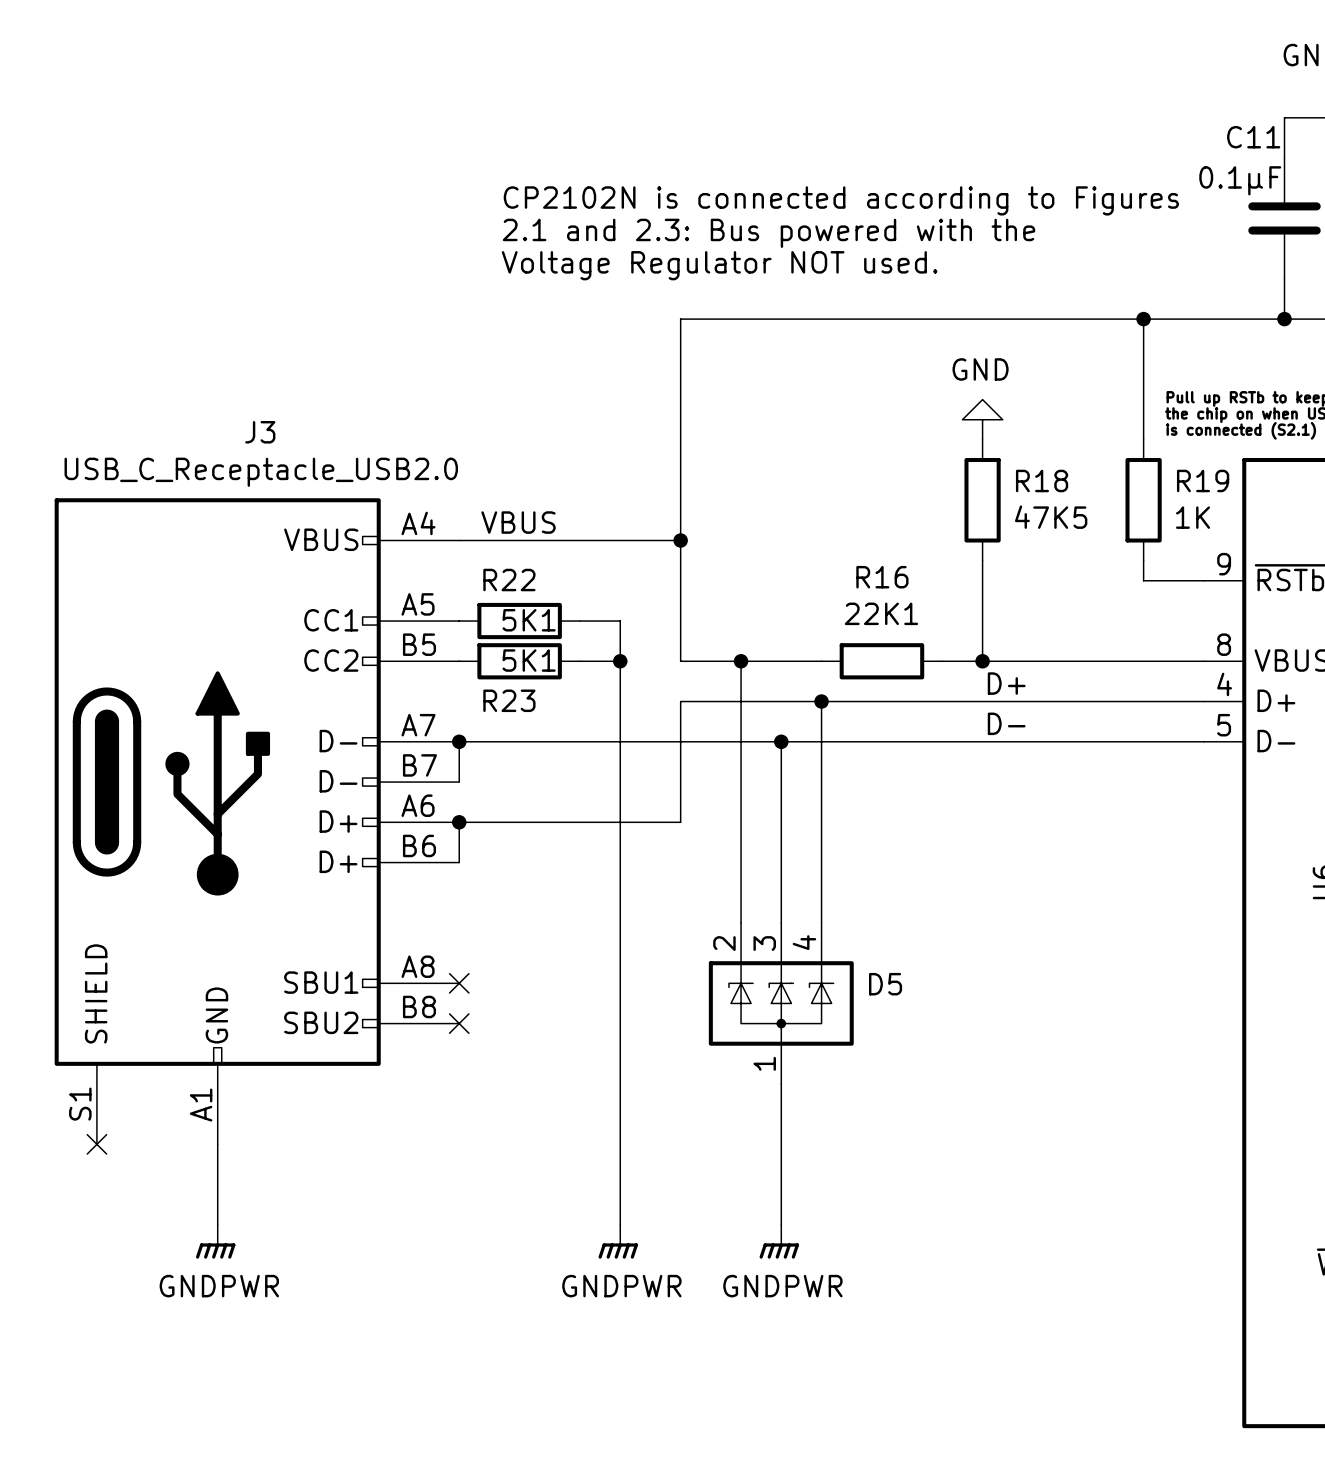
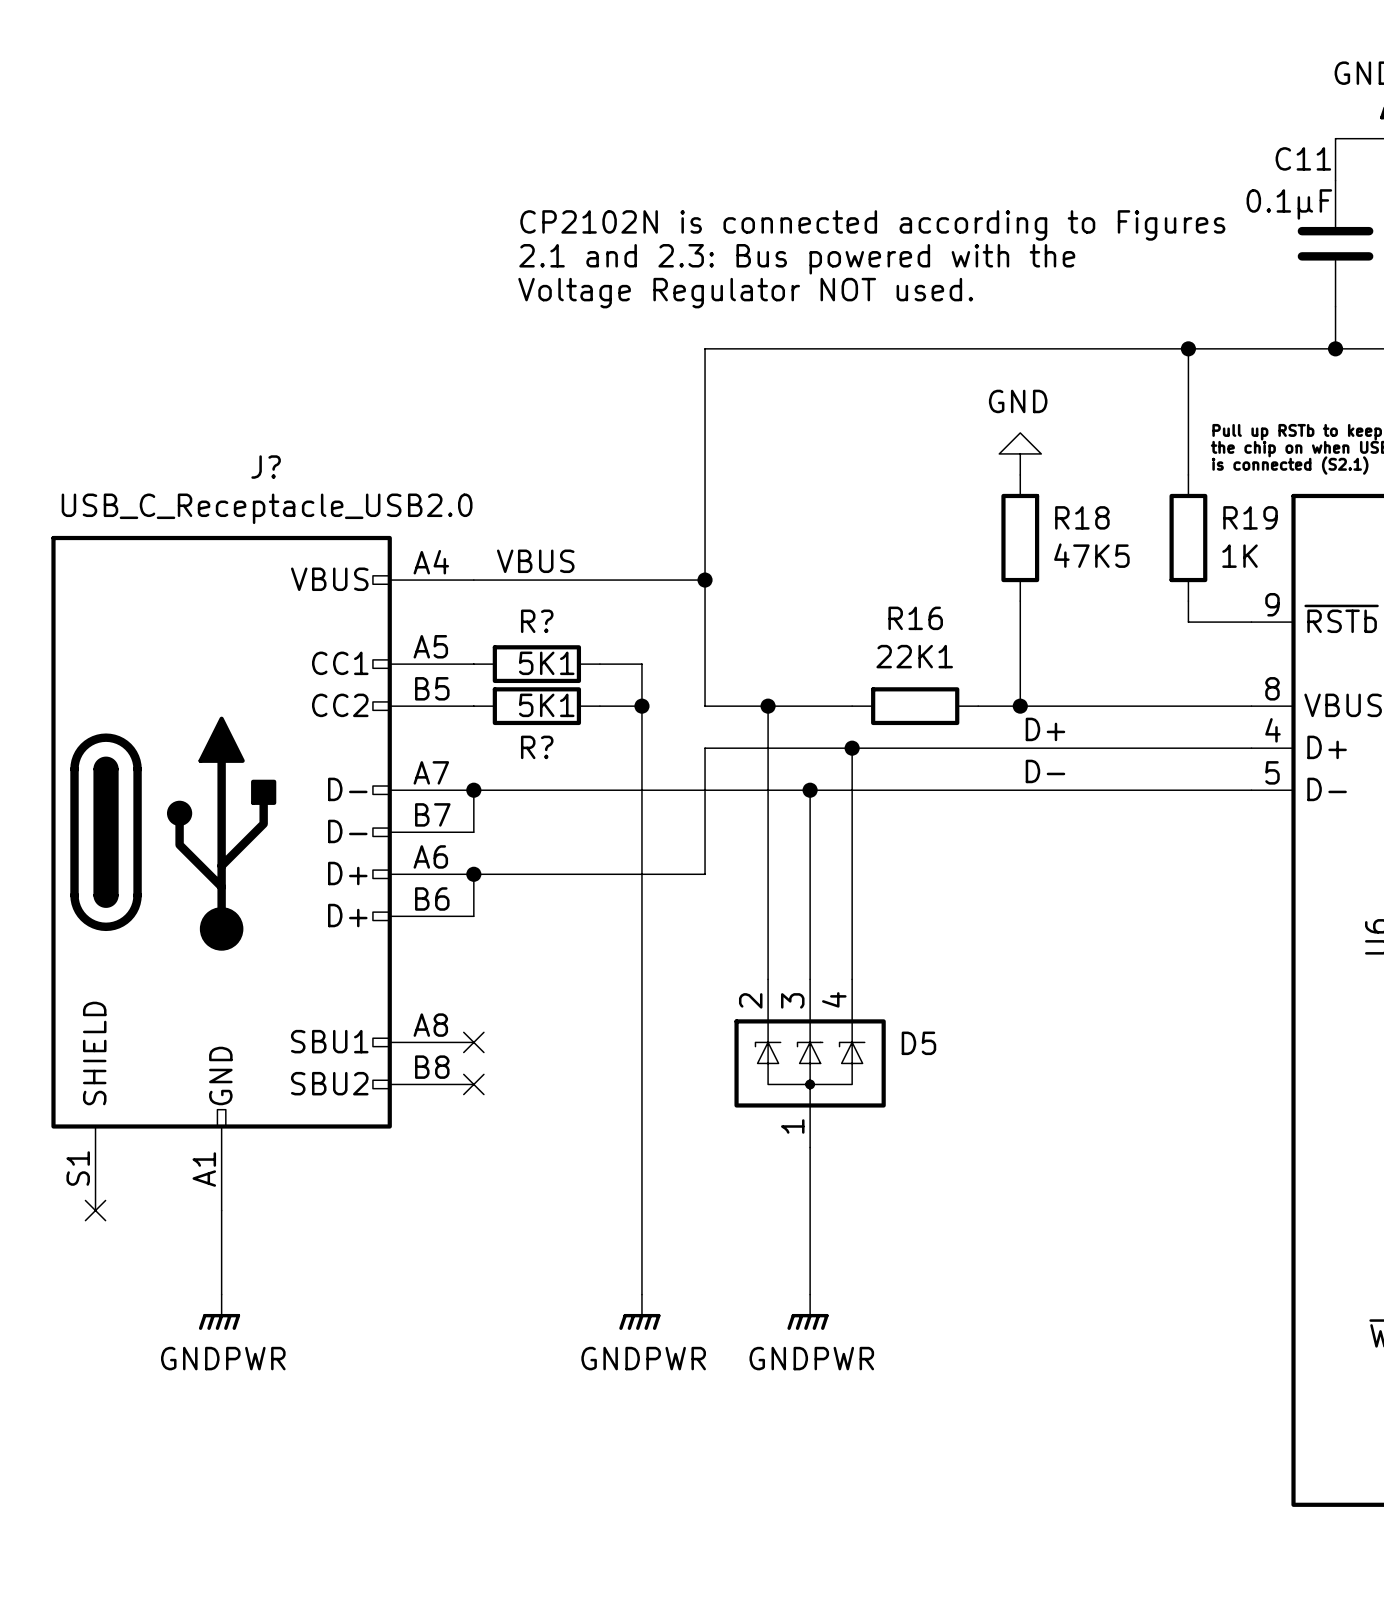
J3 name: J3 (260, 432) -> J? (266, 467)
R22 name: R22 (509, 580) -> R? (537, 621)
R23 name: R23 (509, 700) -> R? (537, 747)

